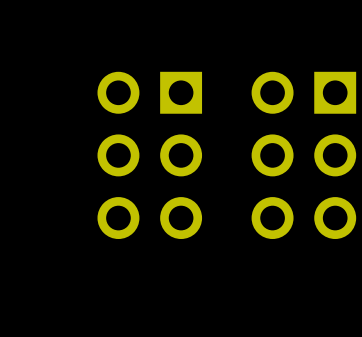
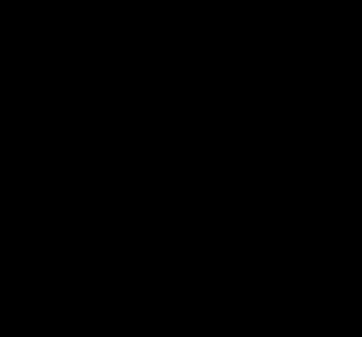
part: (149, 155) -> none
part: (303, 155) -> none

